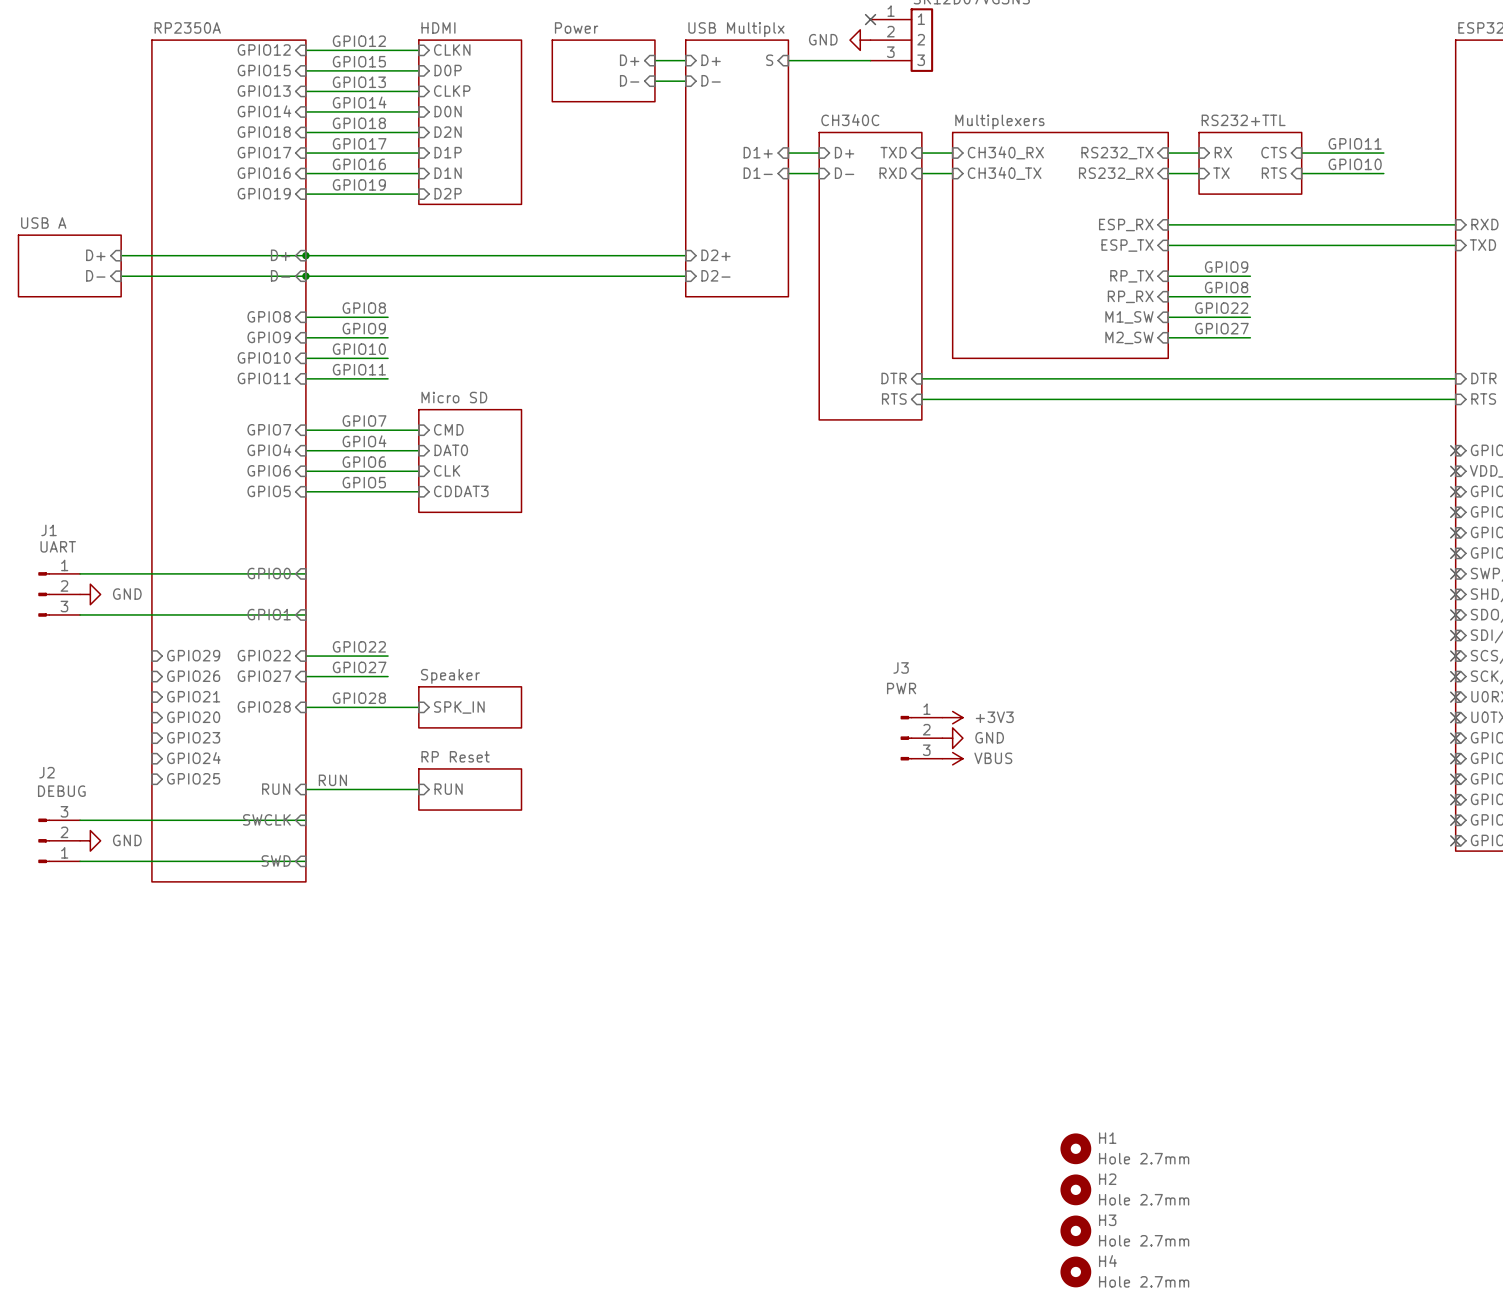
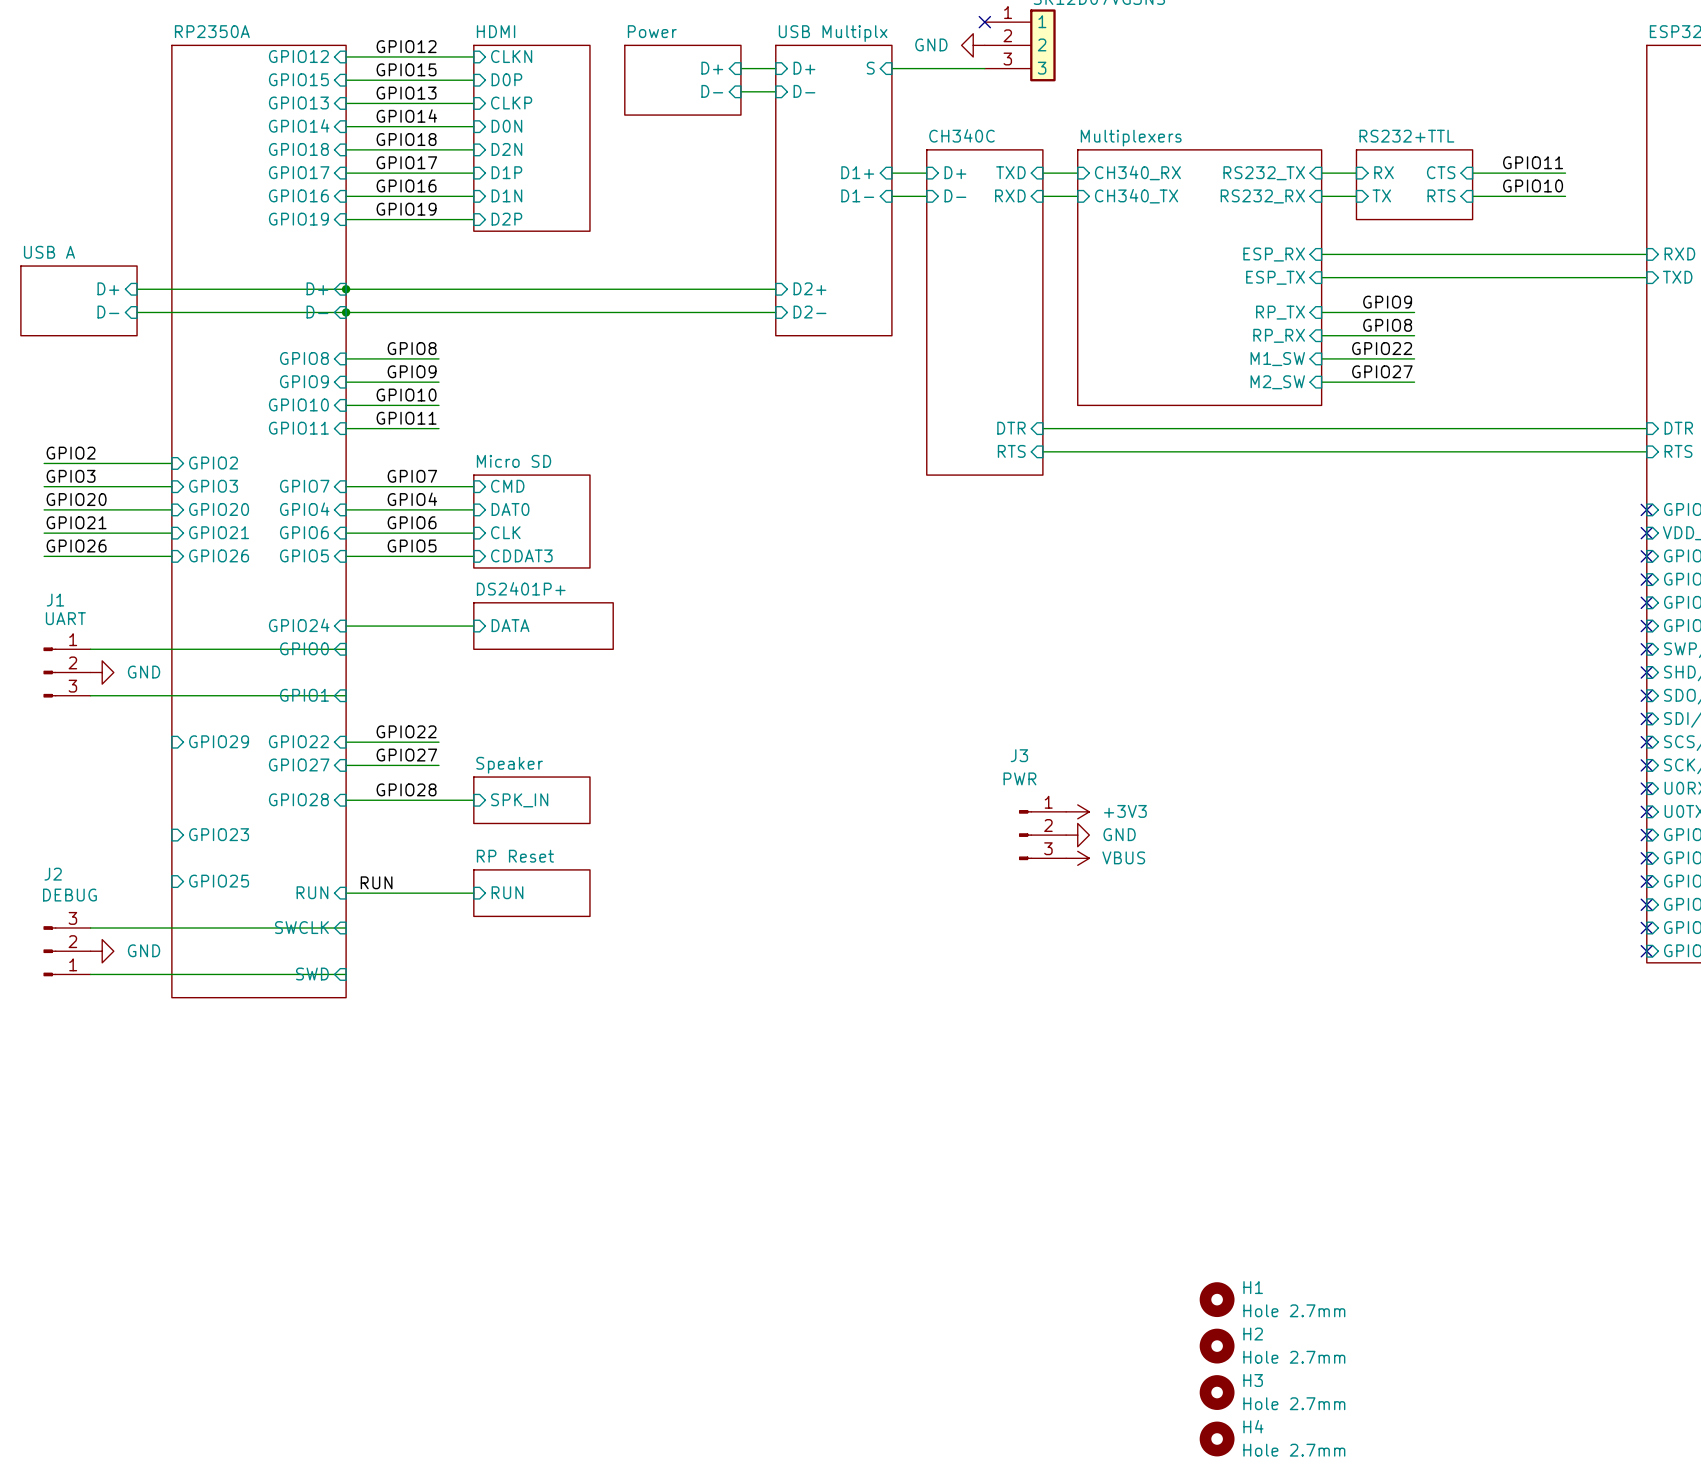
label: none -> GPIO2 (71, 453)
wire: none -> (44, 463) (171, 463)
sheet pin: none -> GPIO2 (213, 463)
sheet Micro SD shape: [418, 409, 523, 513] -> [473, 474, 591, 569]
label: none -> GPIO3 (71, 476)
sheet pin: none -> GPIO3 (213, 486)
wire: none -> (44, 486) (171, 486)
label: none -> GPIO20 (76, 499)
wire: none -> (44, 509) (171, 509)
sheet pin: none -> GPIO20 (219, 509)
label: none -> GPIO21 (76, 522)
sheet pin: none -> GPIO21 (219, 532)
wire: none -> (44, 533) (171, 533)
label: none -> GPIO26 (76, 546)
wire: none -> (44, 556) (171, 556)
sheet pin: none -> GPIO24 (299, 625)
wire: none -> (346, 626) (473, 626)
sheet pin: none -> DATA (510, 625)
sheet DS2401P+: none -> (543, 626)
sheet pin position: GPIO26 (193, 676) -> GPIO26 (219, 555)
sheet pin: GPIO21 (193, 696) -> none
sheet pin: GPIO20 (193, 717) -> none
sheet pin: GPIO24 (193, 758) -> none

